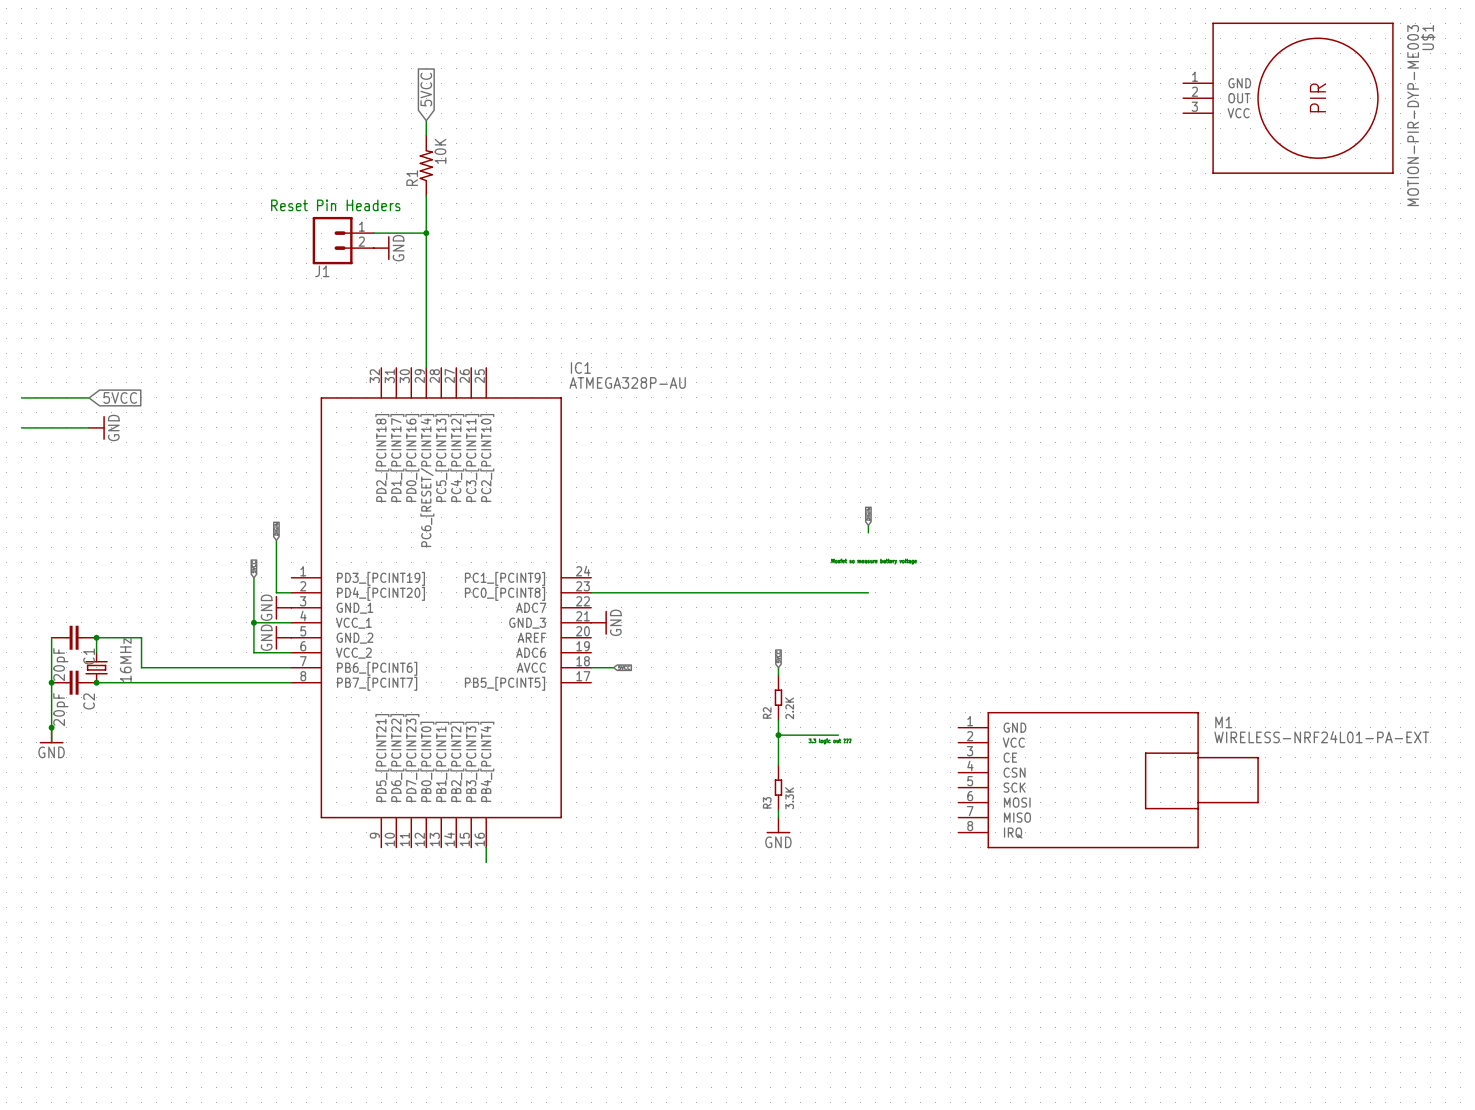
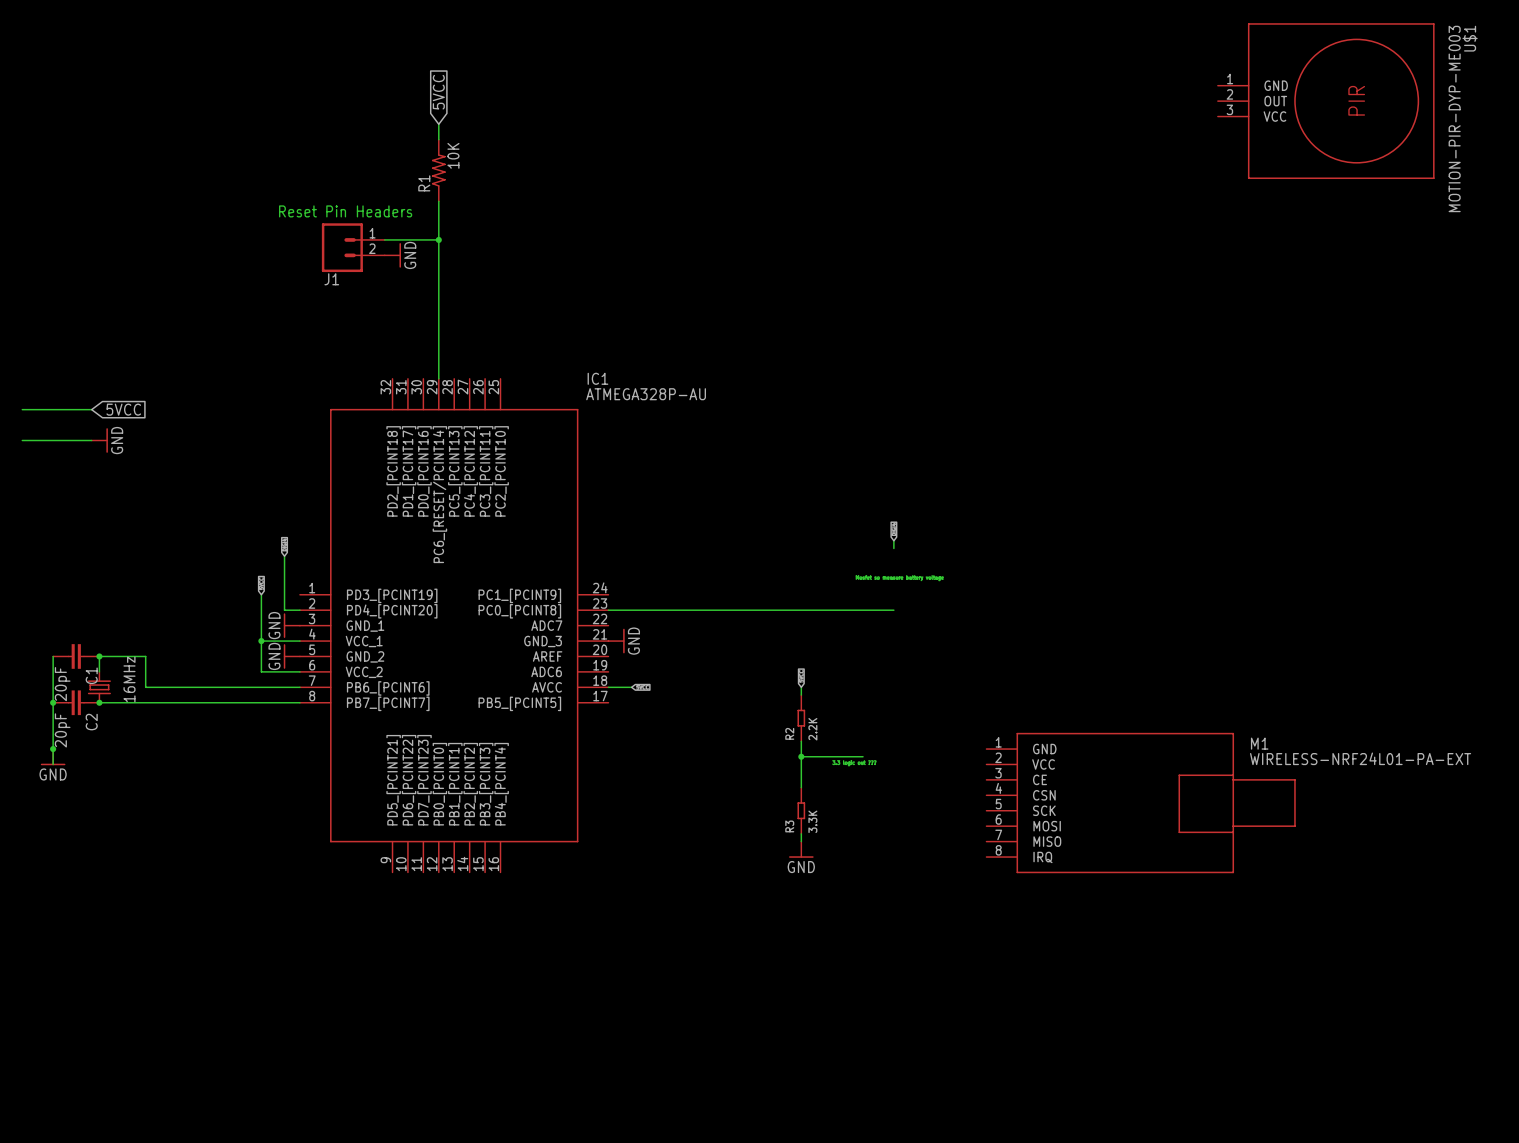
wire: (486, 847) (486, 862) -> none

